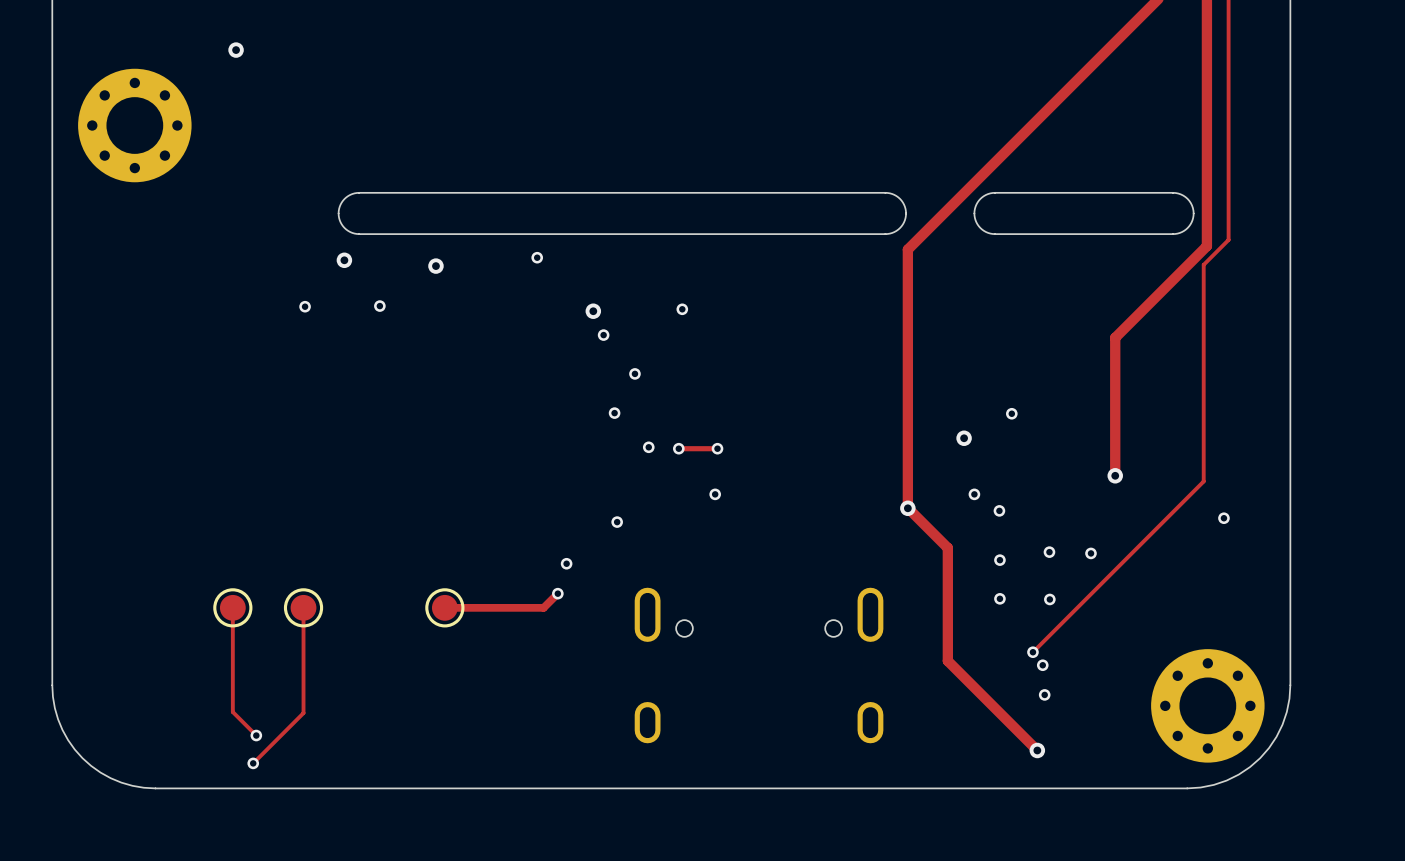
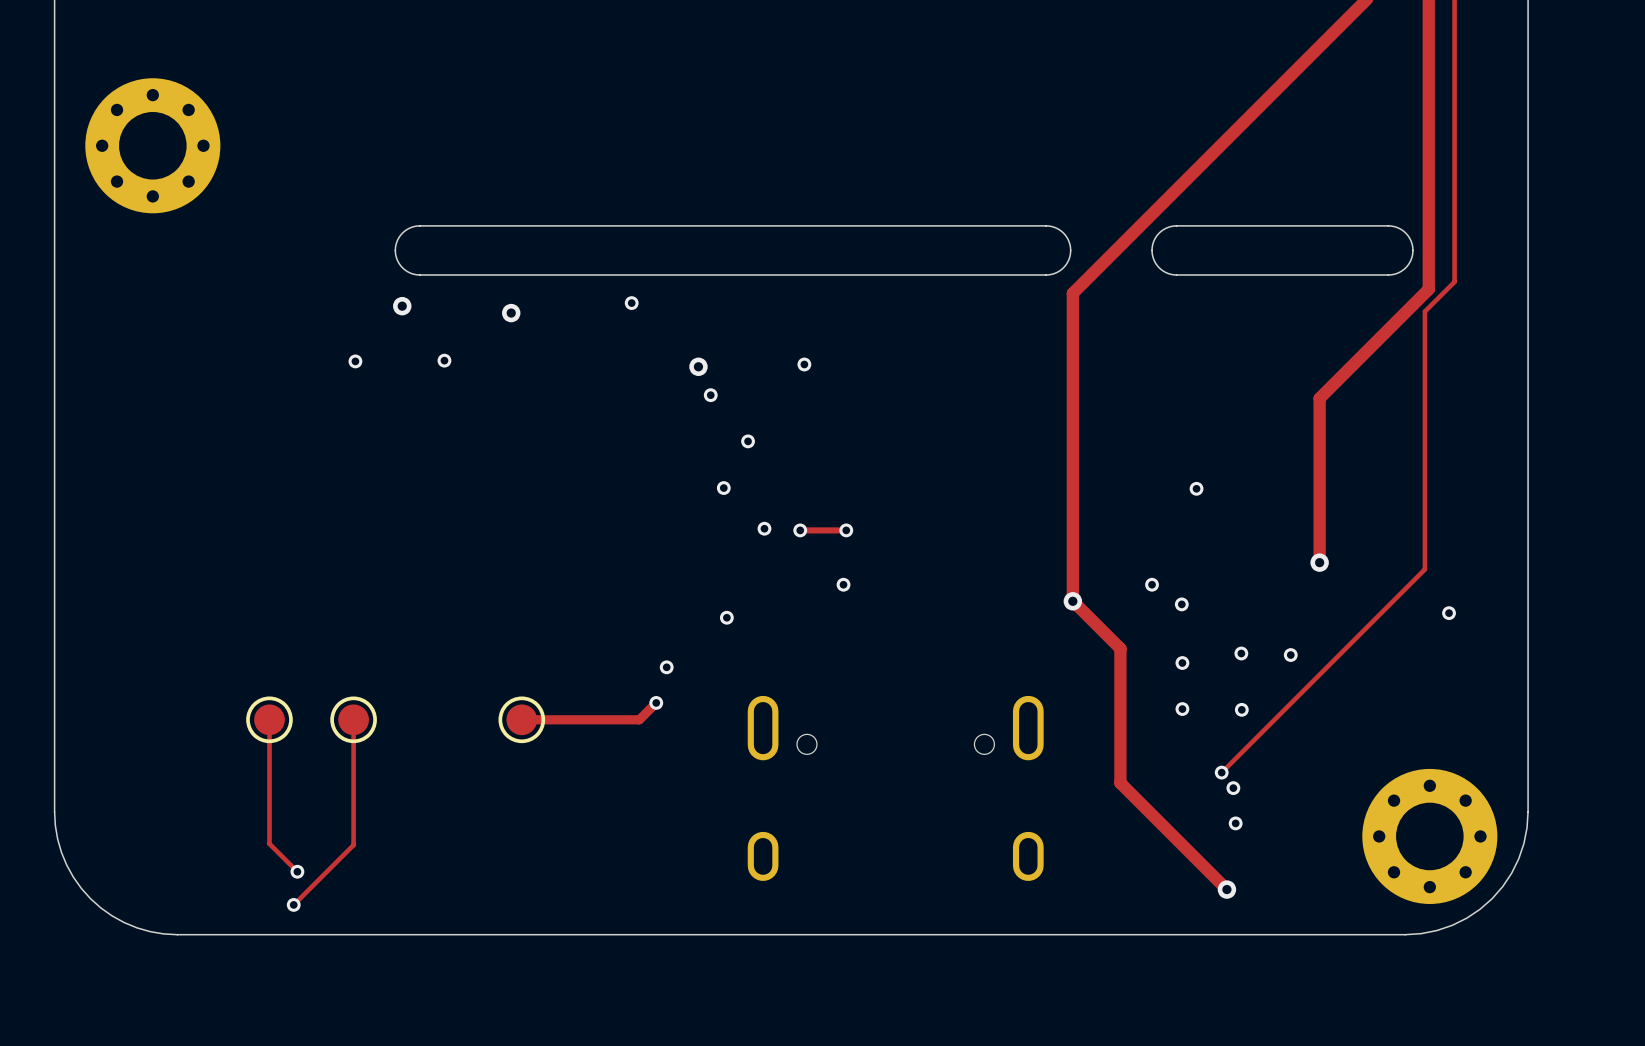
via: (236, 50) -> none
via: (964, 438) -> none

